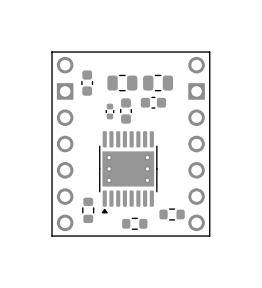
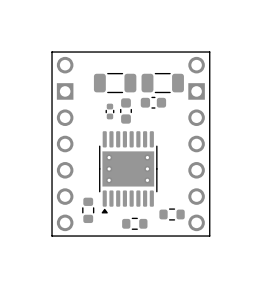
part footprint: [107, 74, 138, 92] -> [93, 73, 137, 94]
part footprint: [143, 74, 174, 92] -> [141, 73, 184, 94]
part: (87, 83) -> none

